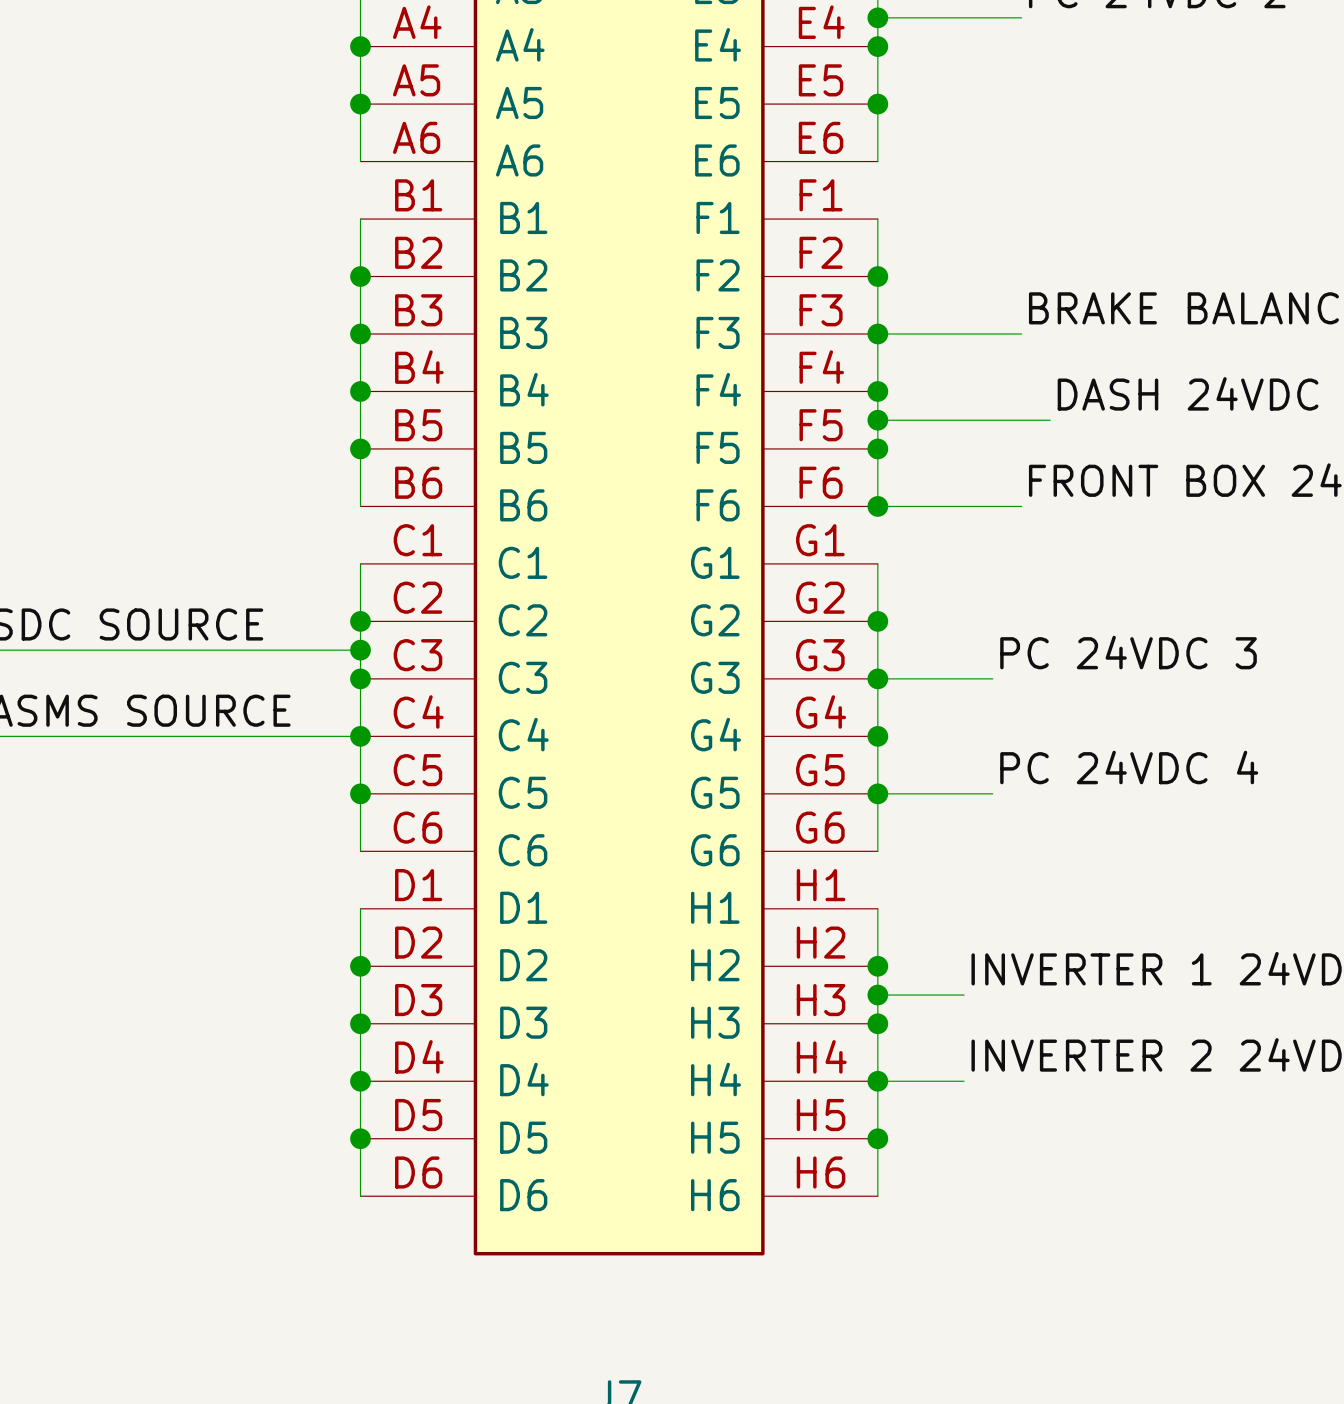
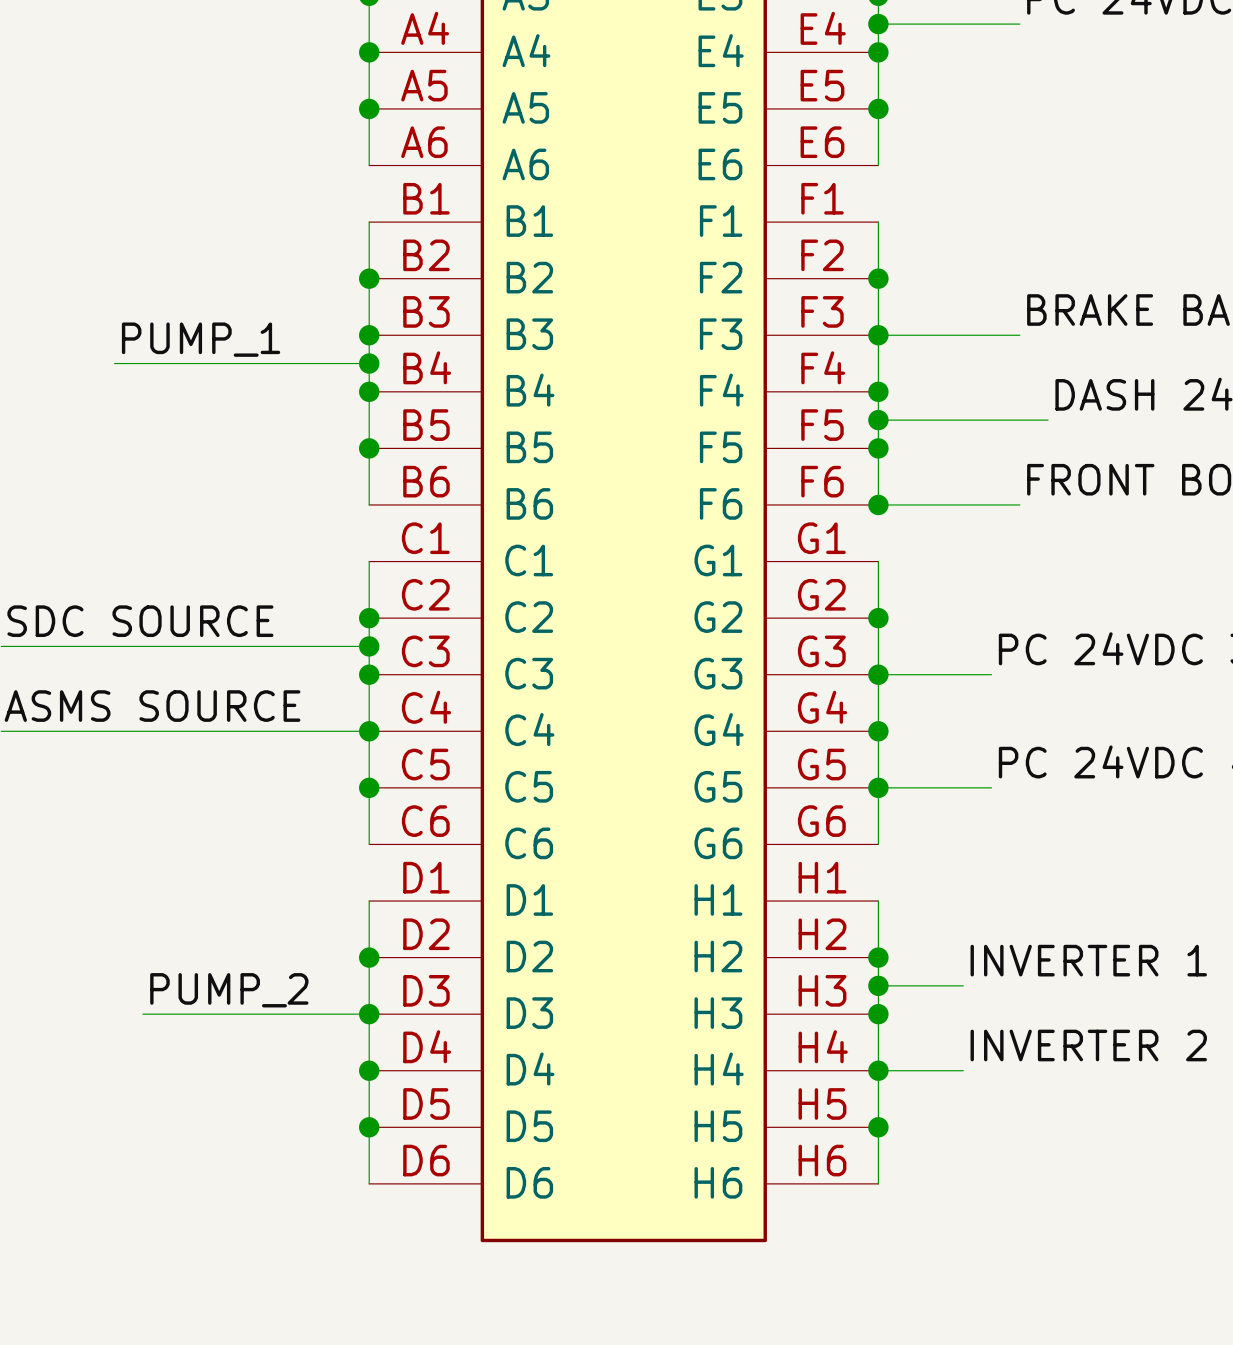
label: none -> PUMP_1 (201, 339)
wire: none -> (114, 363) (369, 363)
junction: none -> (369, 363)
label: none -> PUMP_2 (229, 990)
wire: none -> (142, 1014) (369, 1014)

